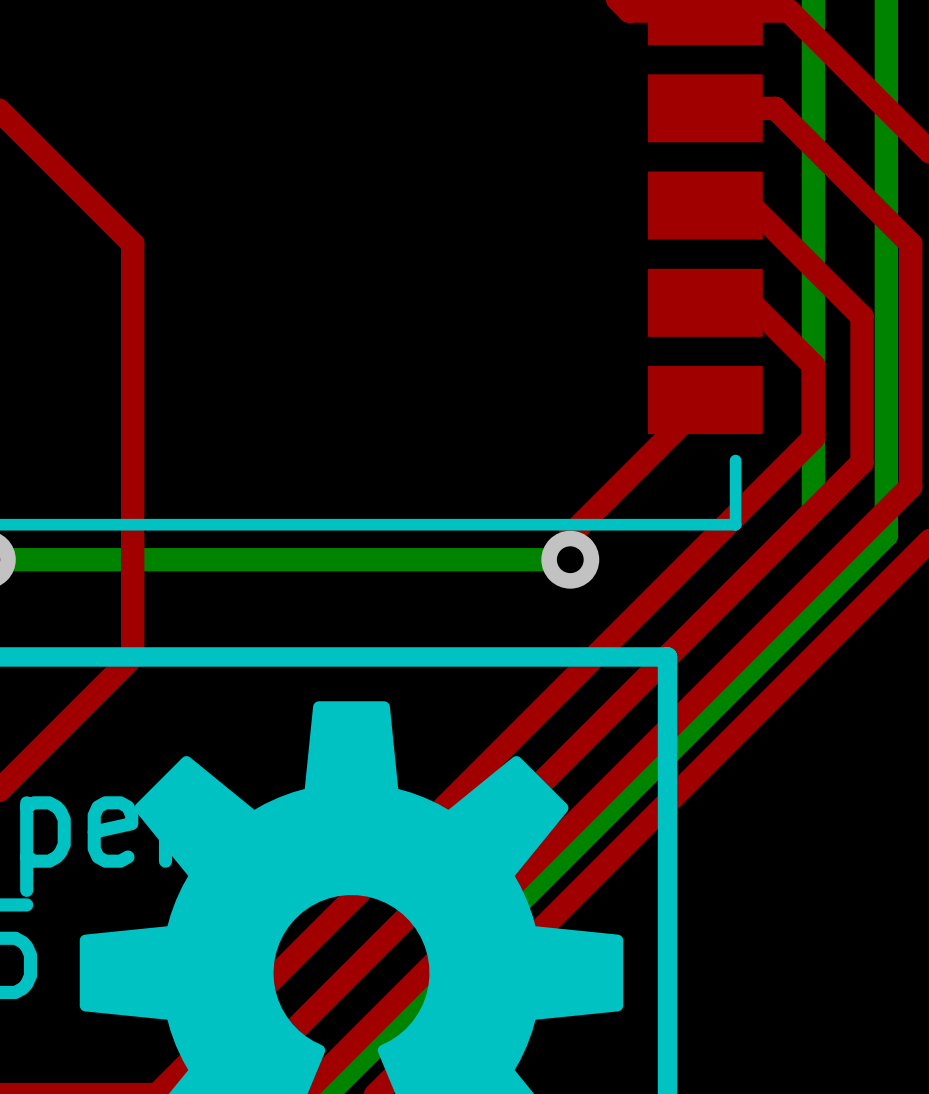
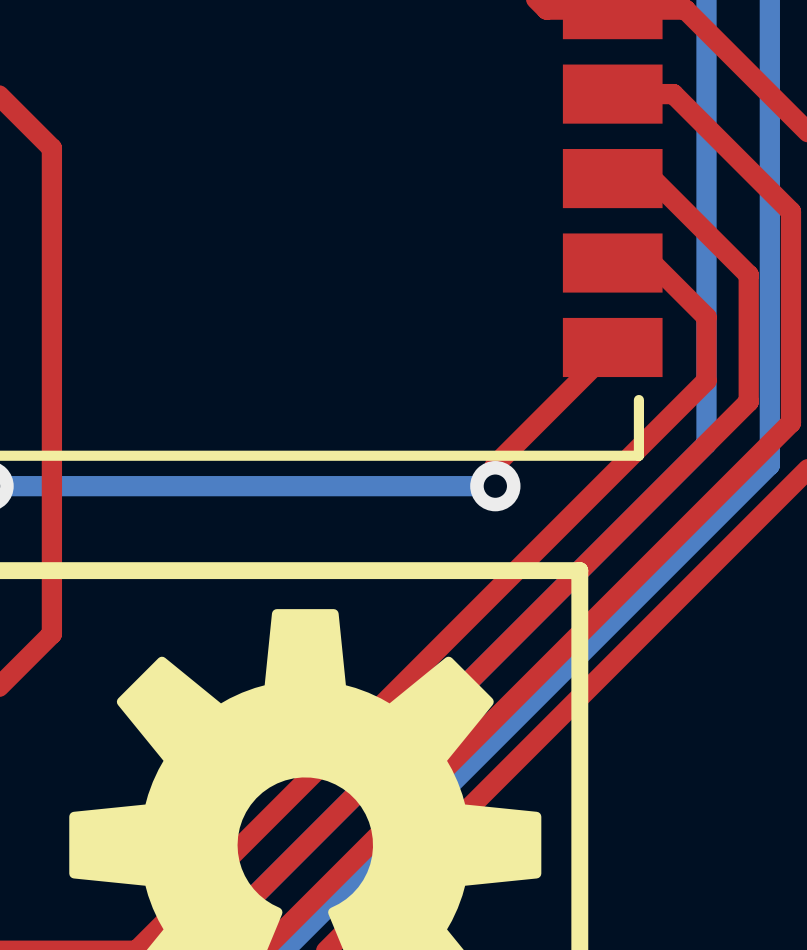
top track: (59, 170) (132, 243) (132, 656) (59, 729) -> (51, 148) (51, 633)

